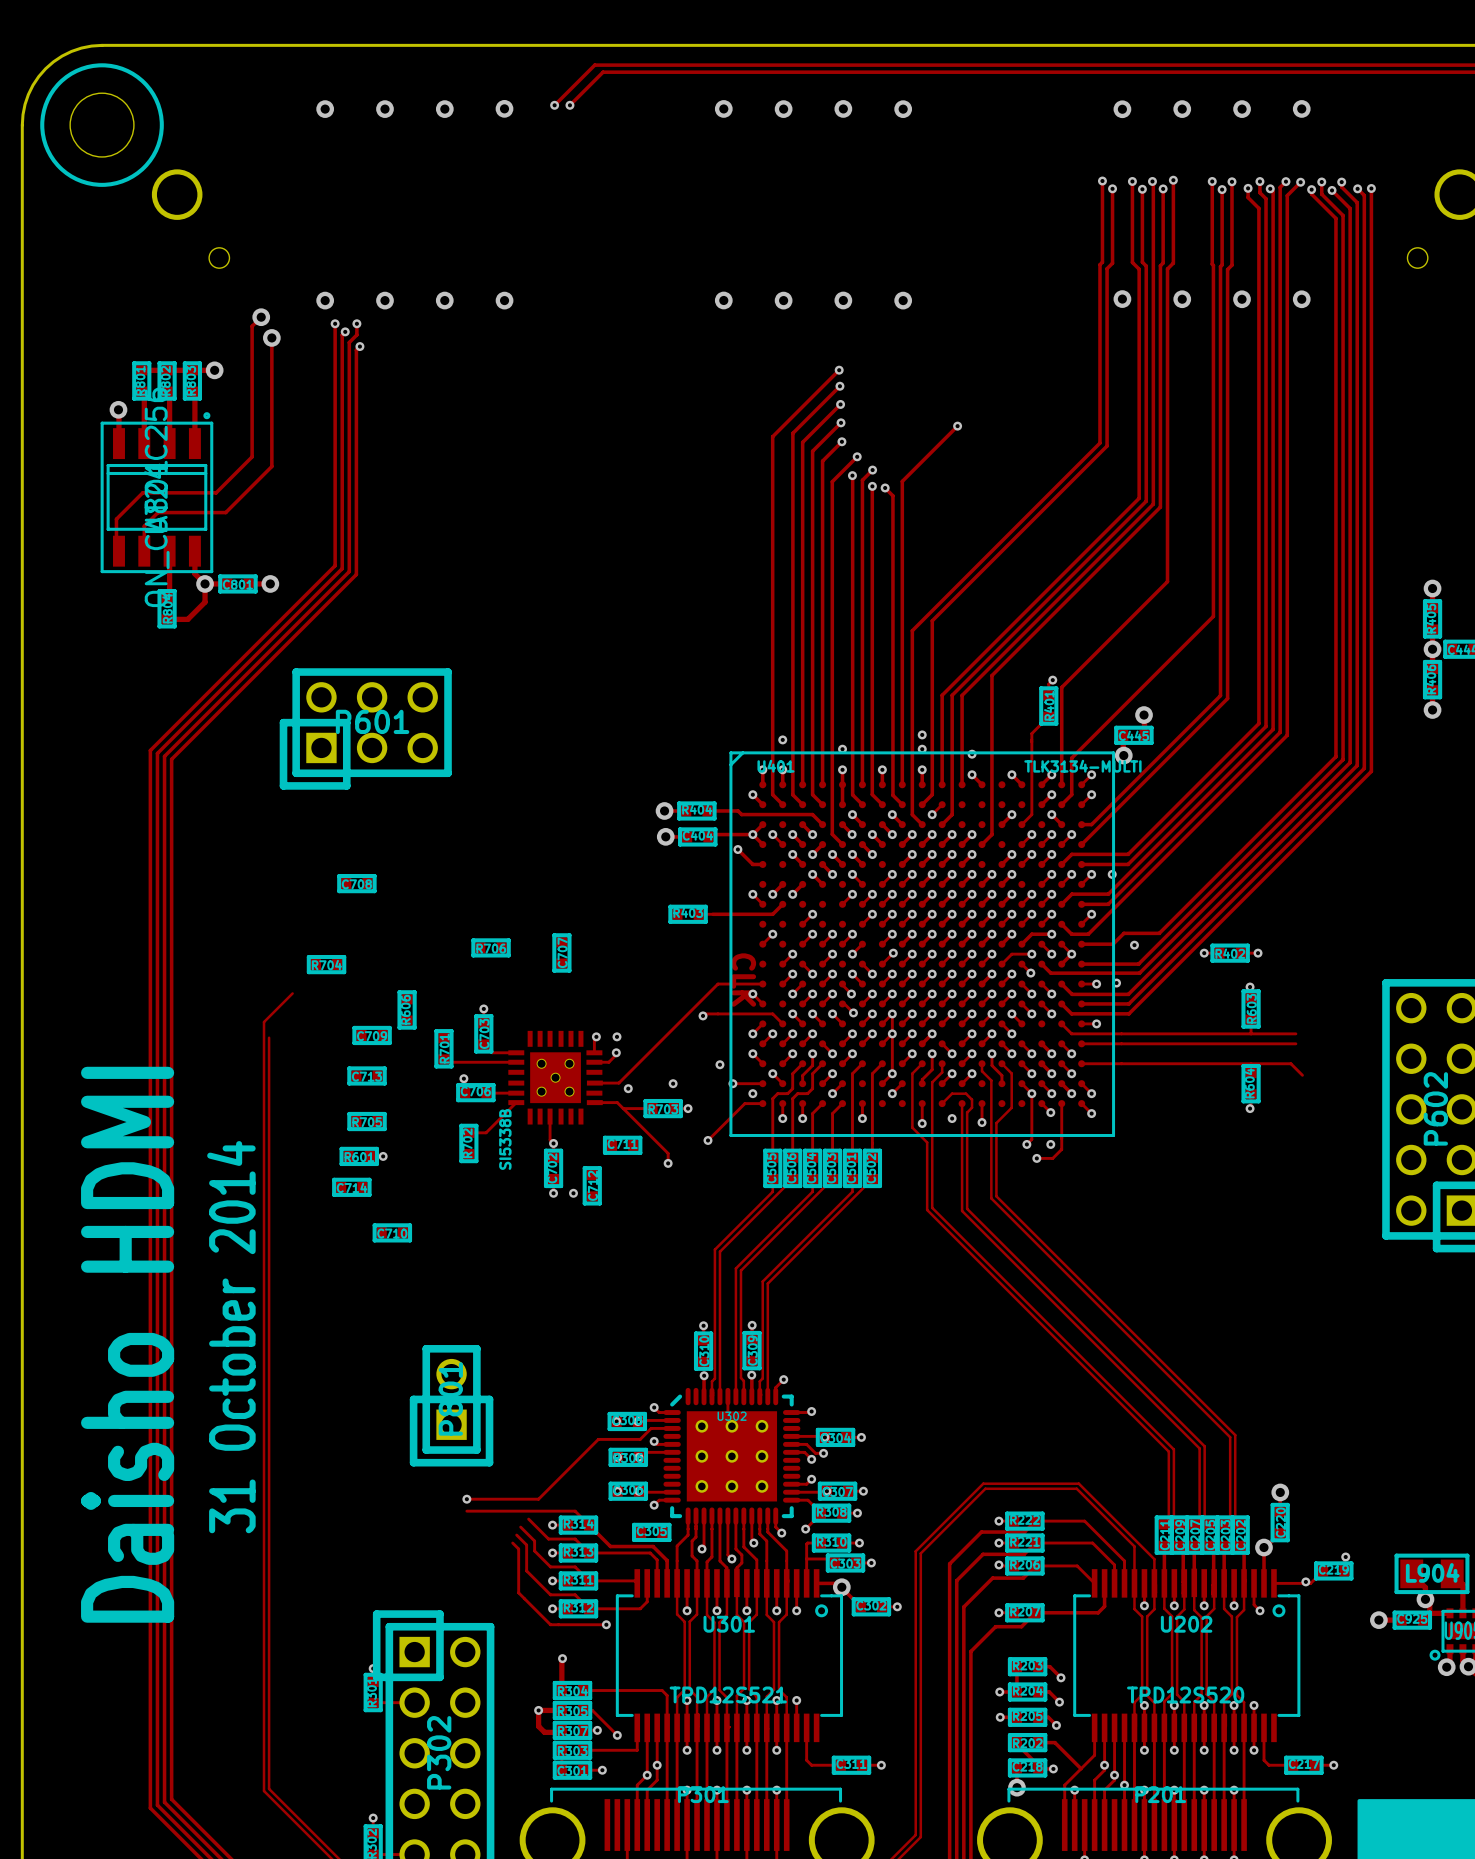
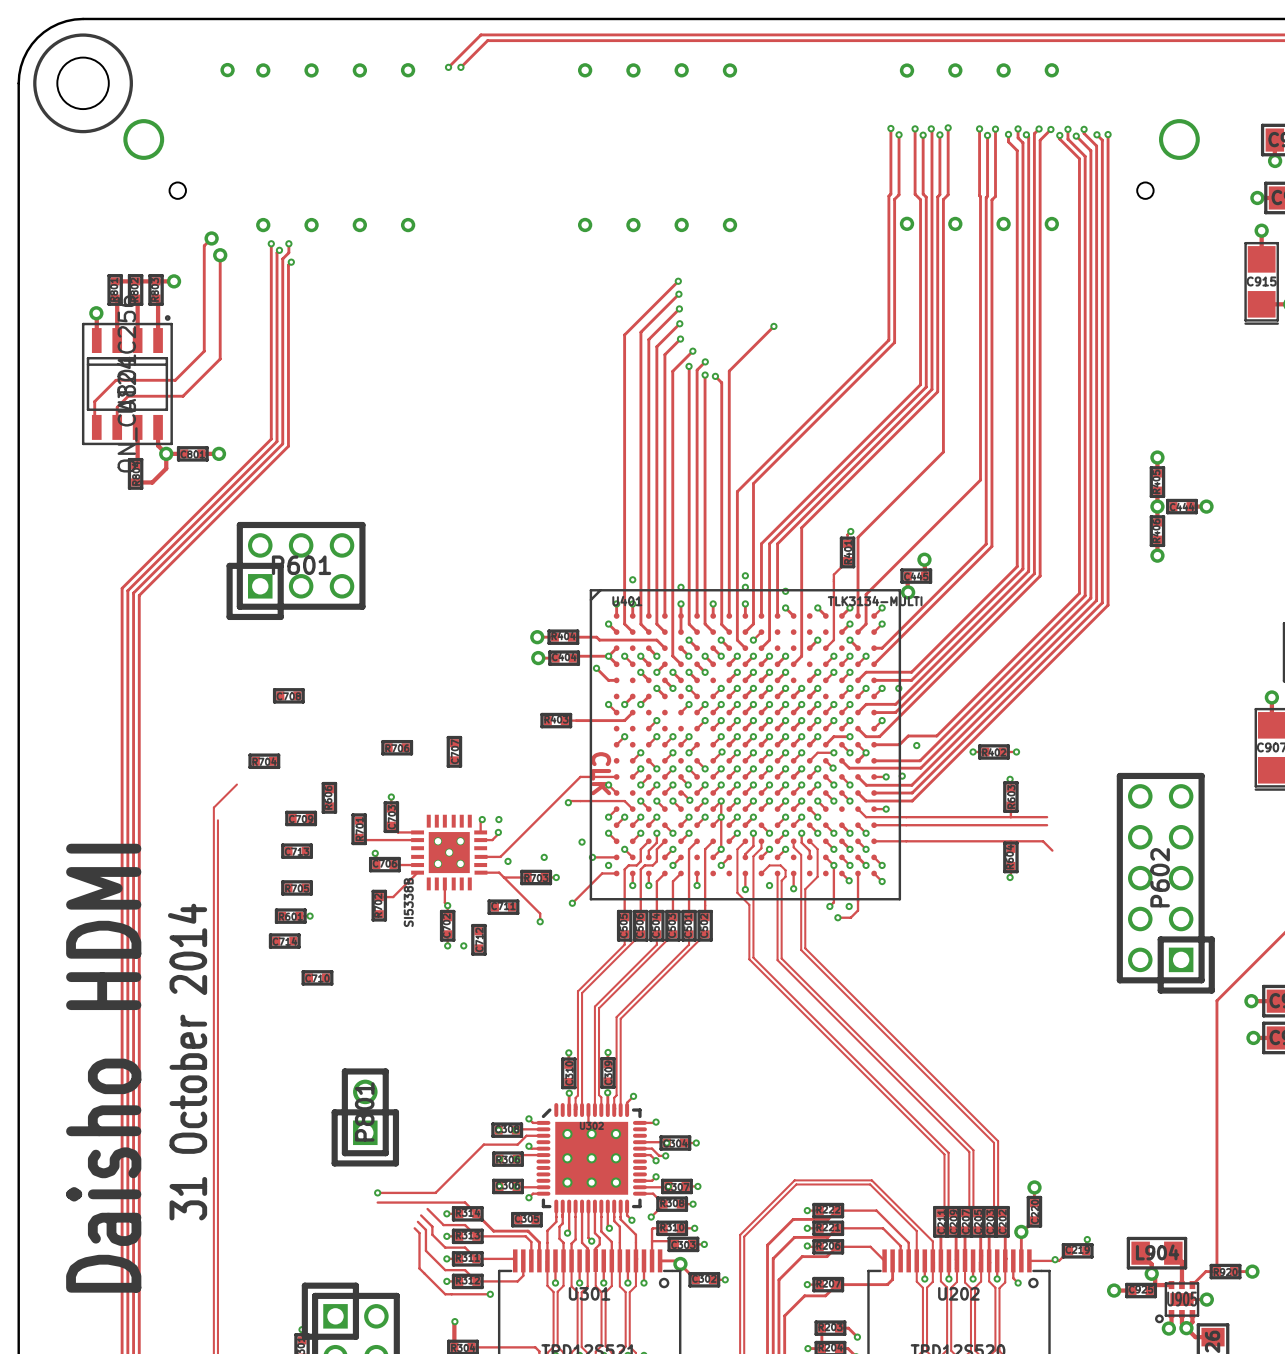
via: none -> (227, 70)

